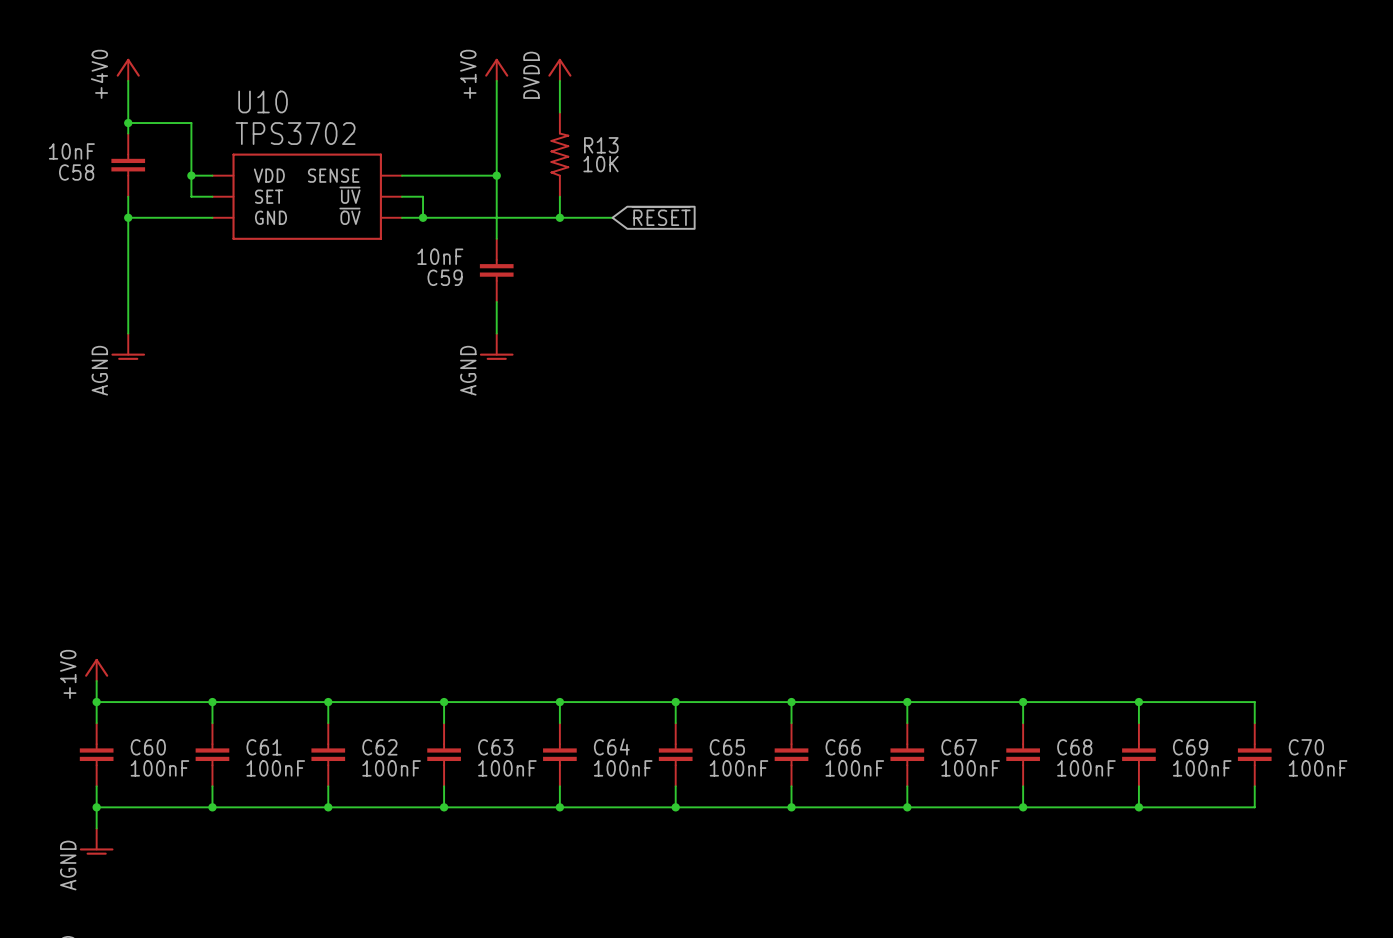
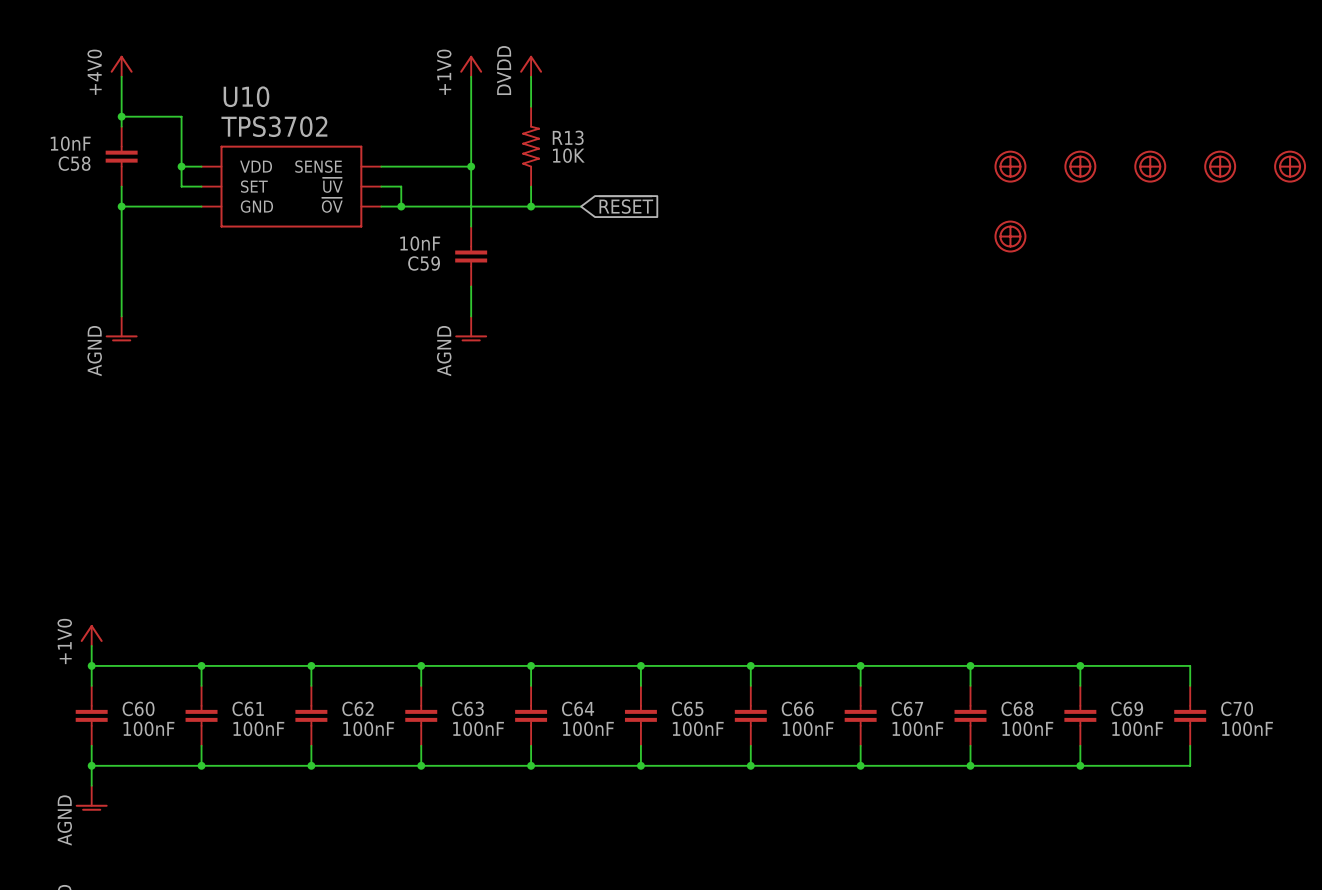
part: none -> (1010, 166)
part: none -> (1080, 166)
part: none -> (1150, 166)
part: none -> (1220, 166)
part: none -> (1290, 166)
part: none -> (1010, 236)

